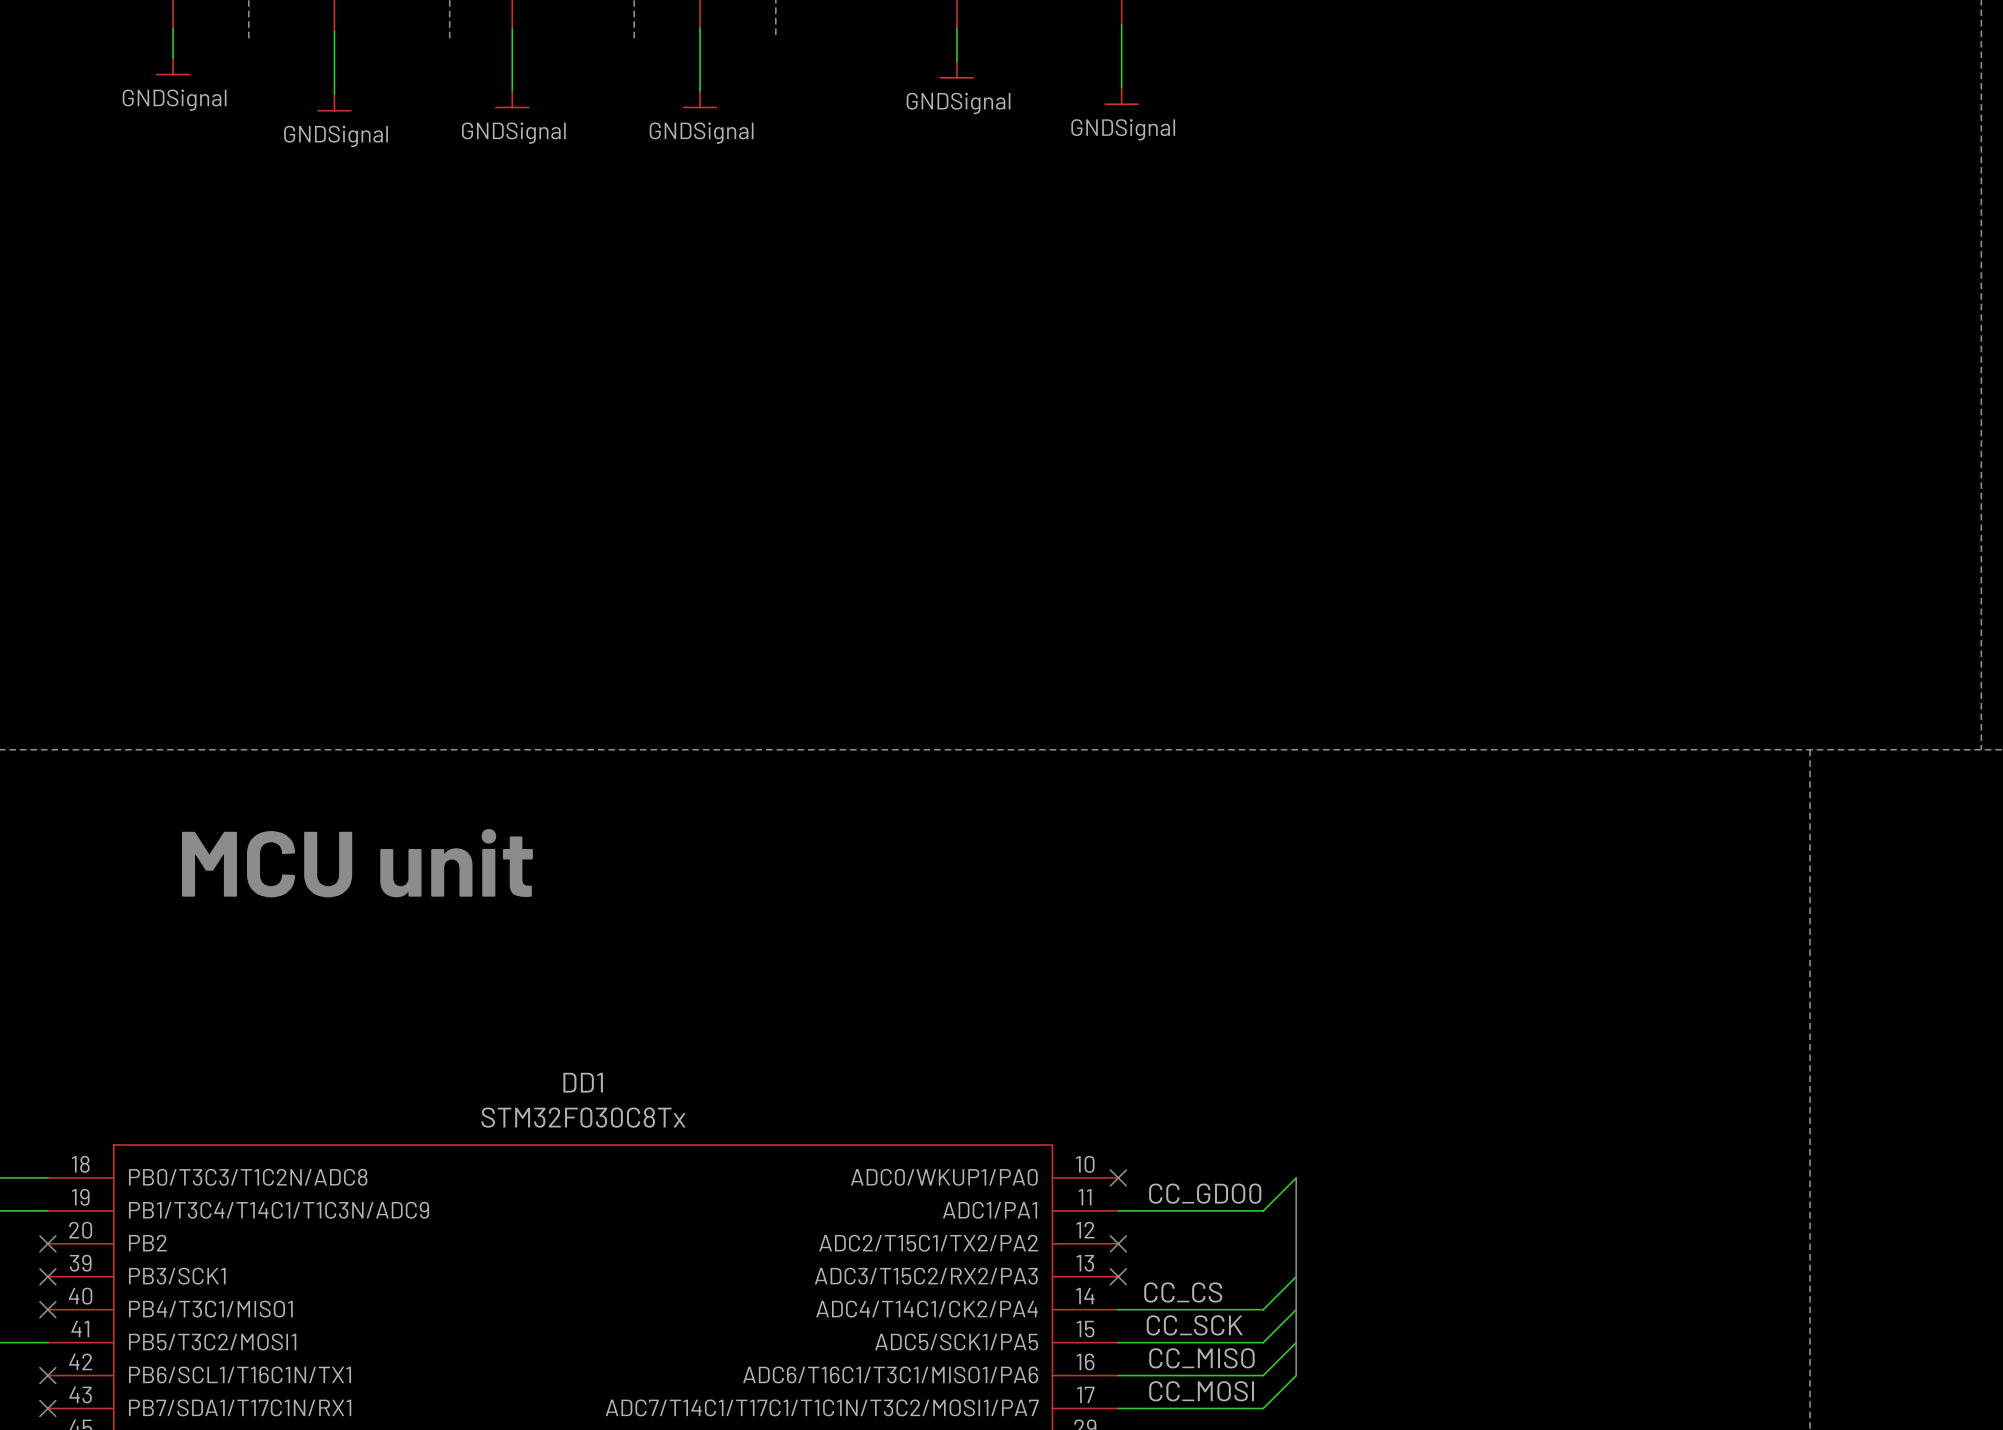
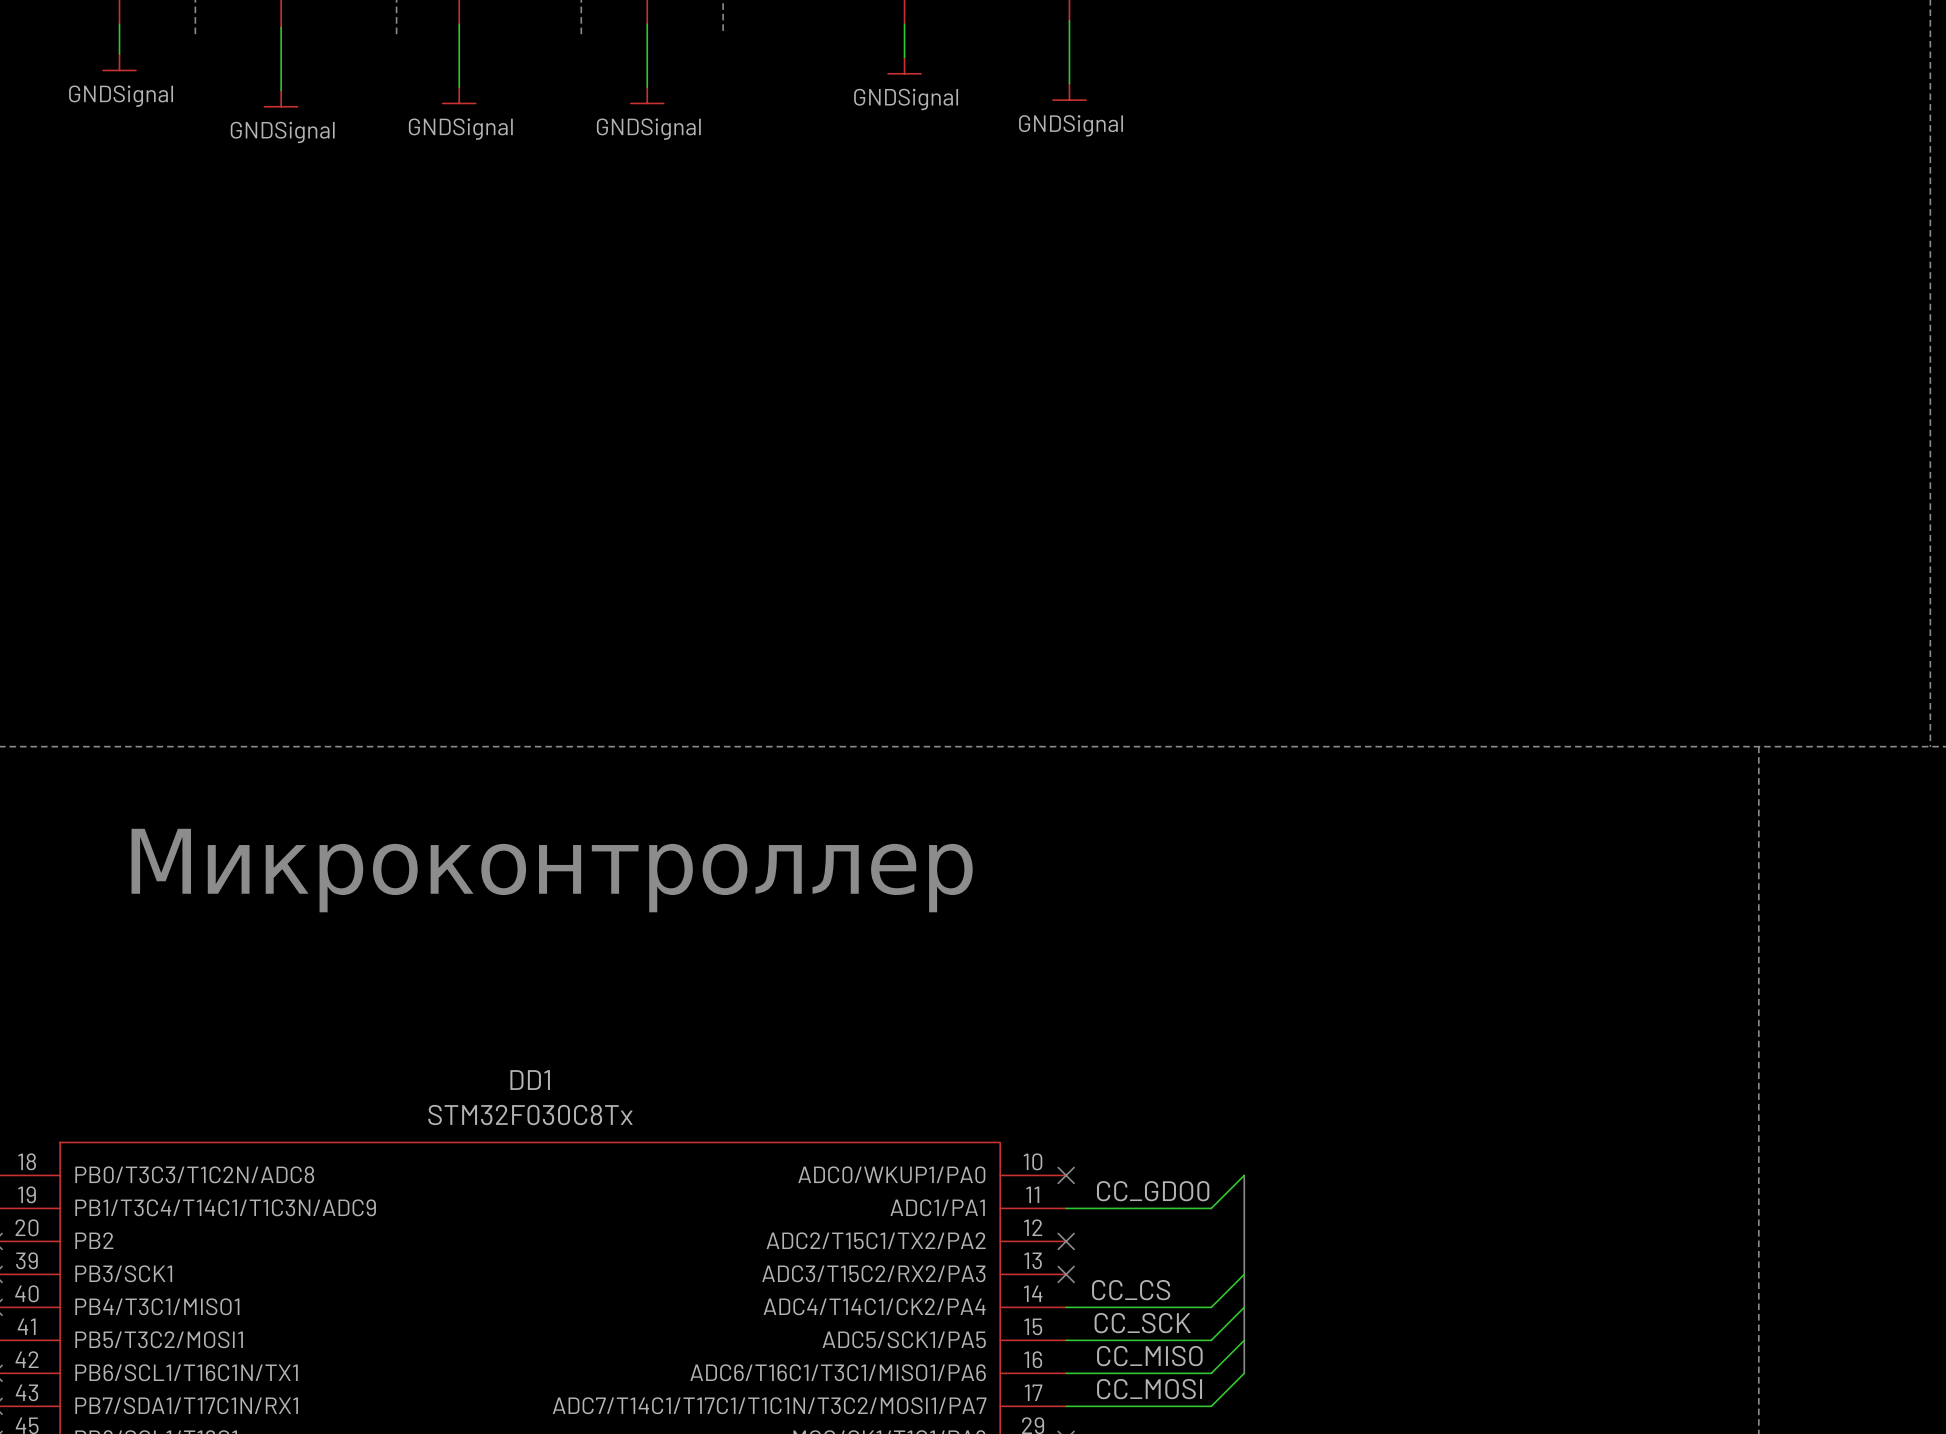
text: MCU unit (357, 863) -> Микроконтроллер (552, 870)

